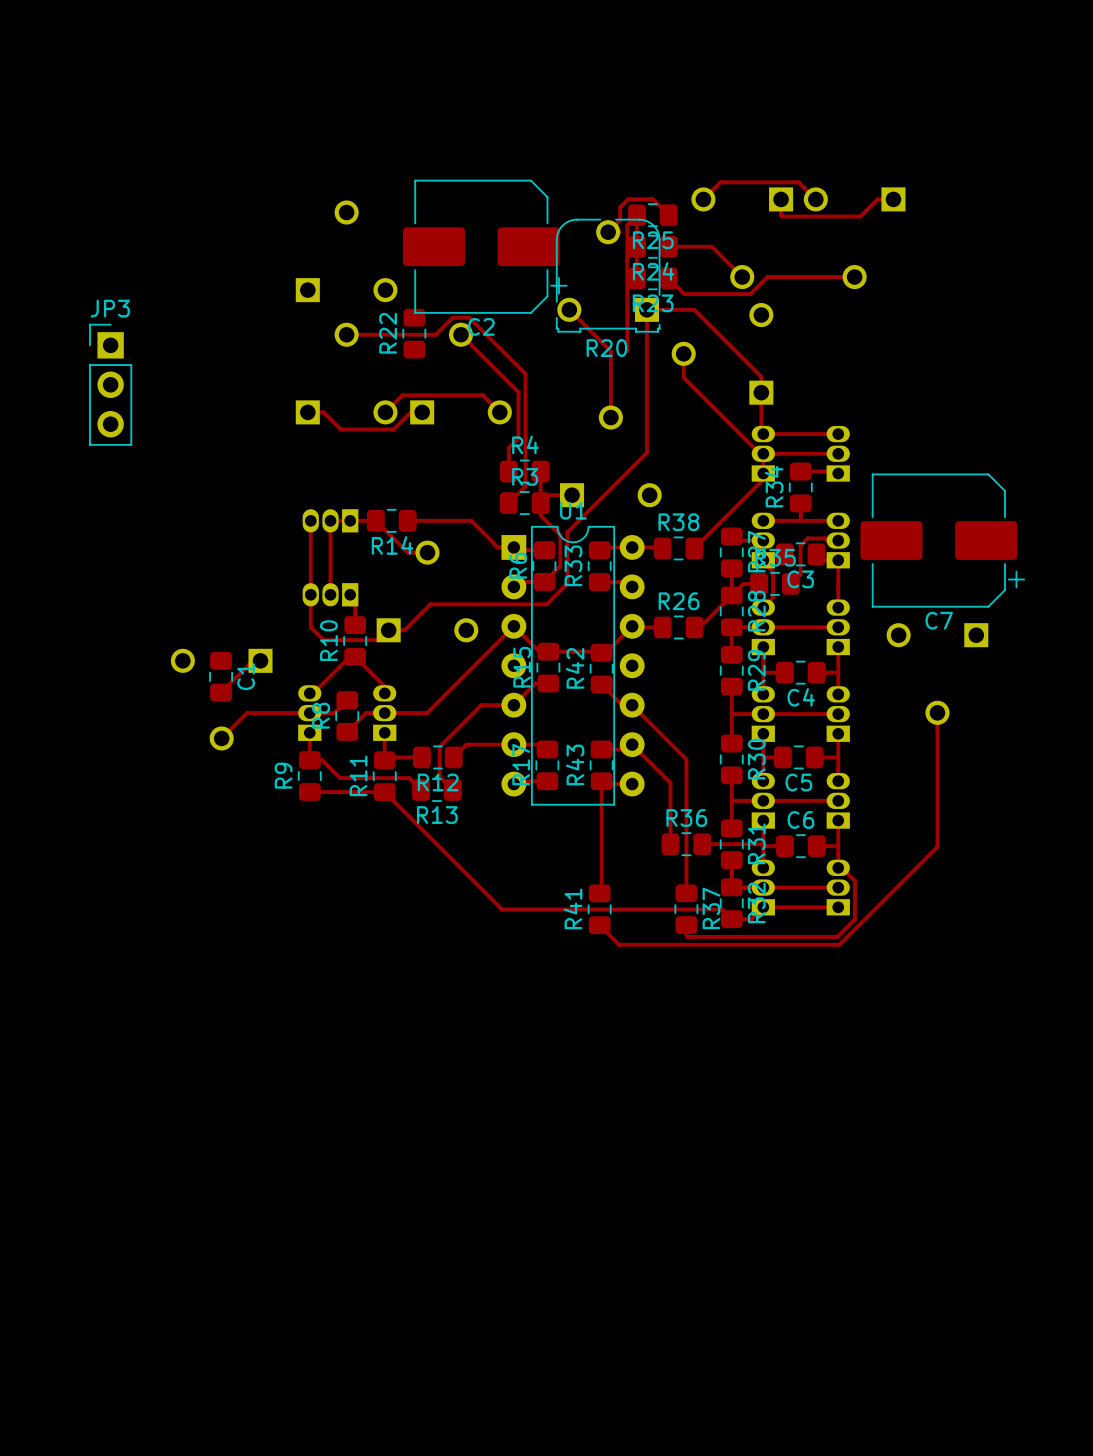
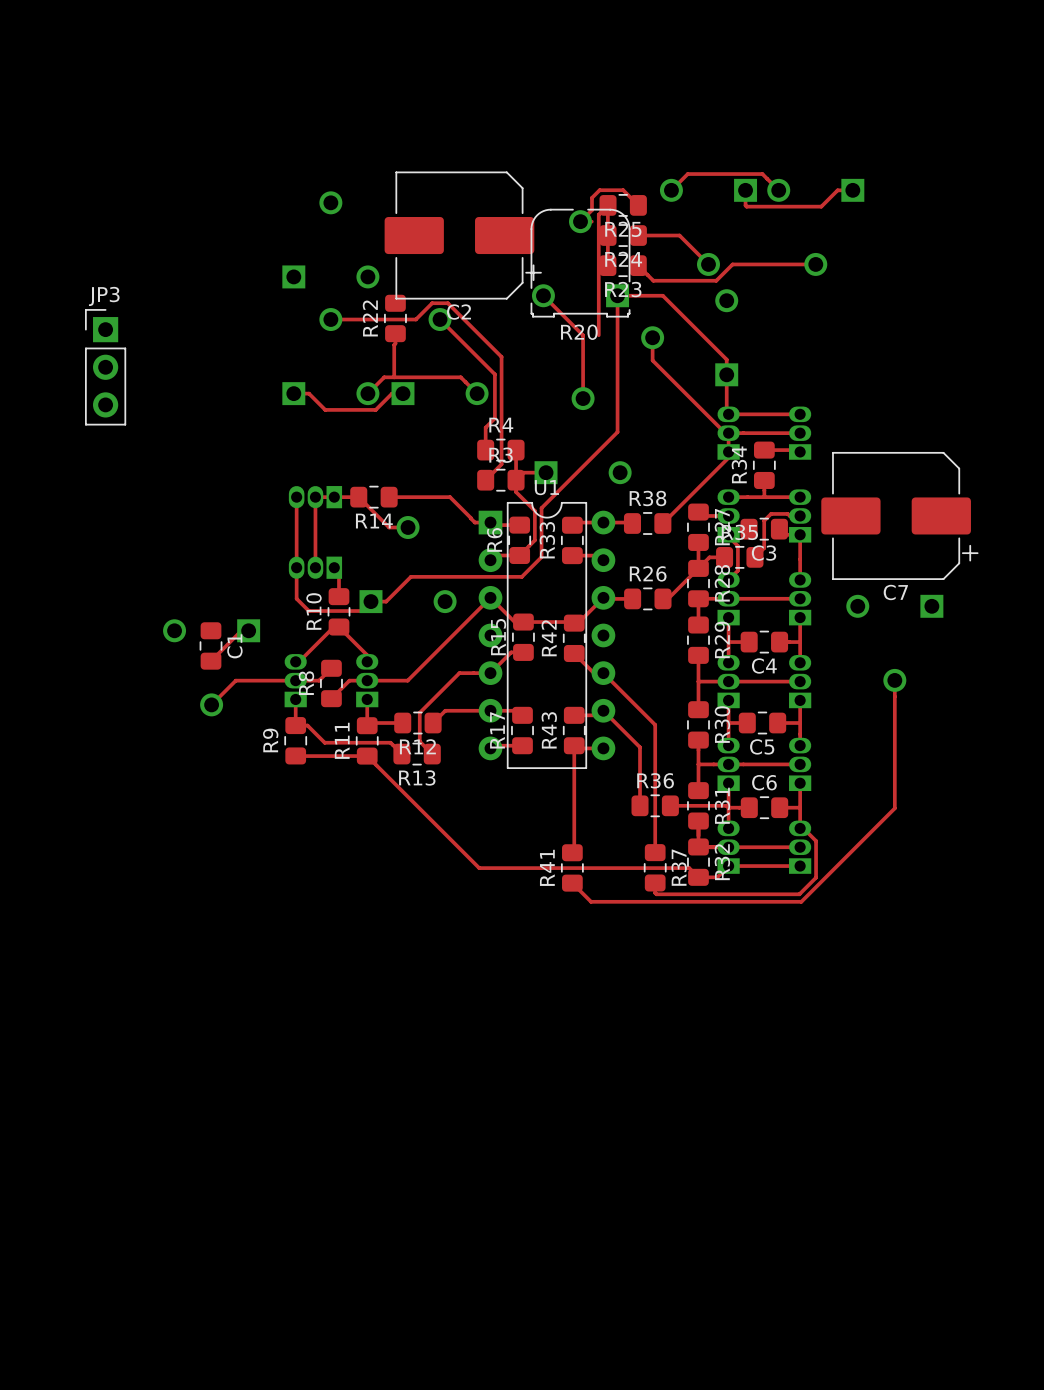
top track: none -> (395, 333) (394, 377)

